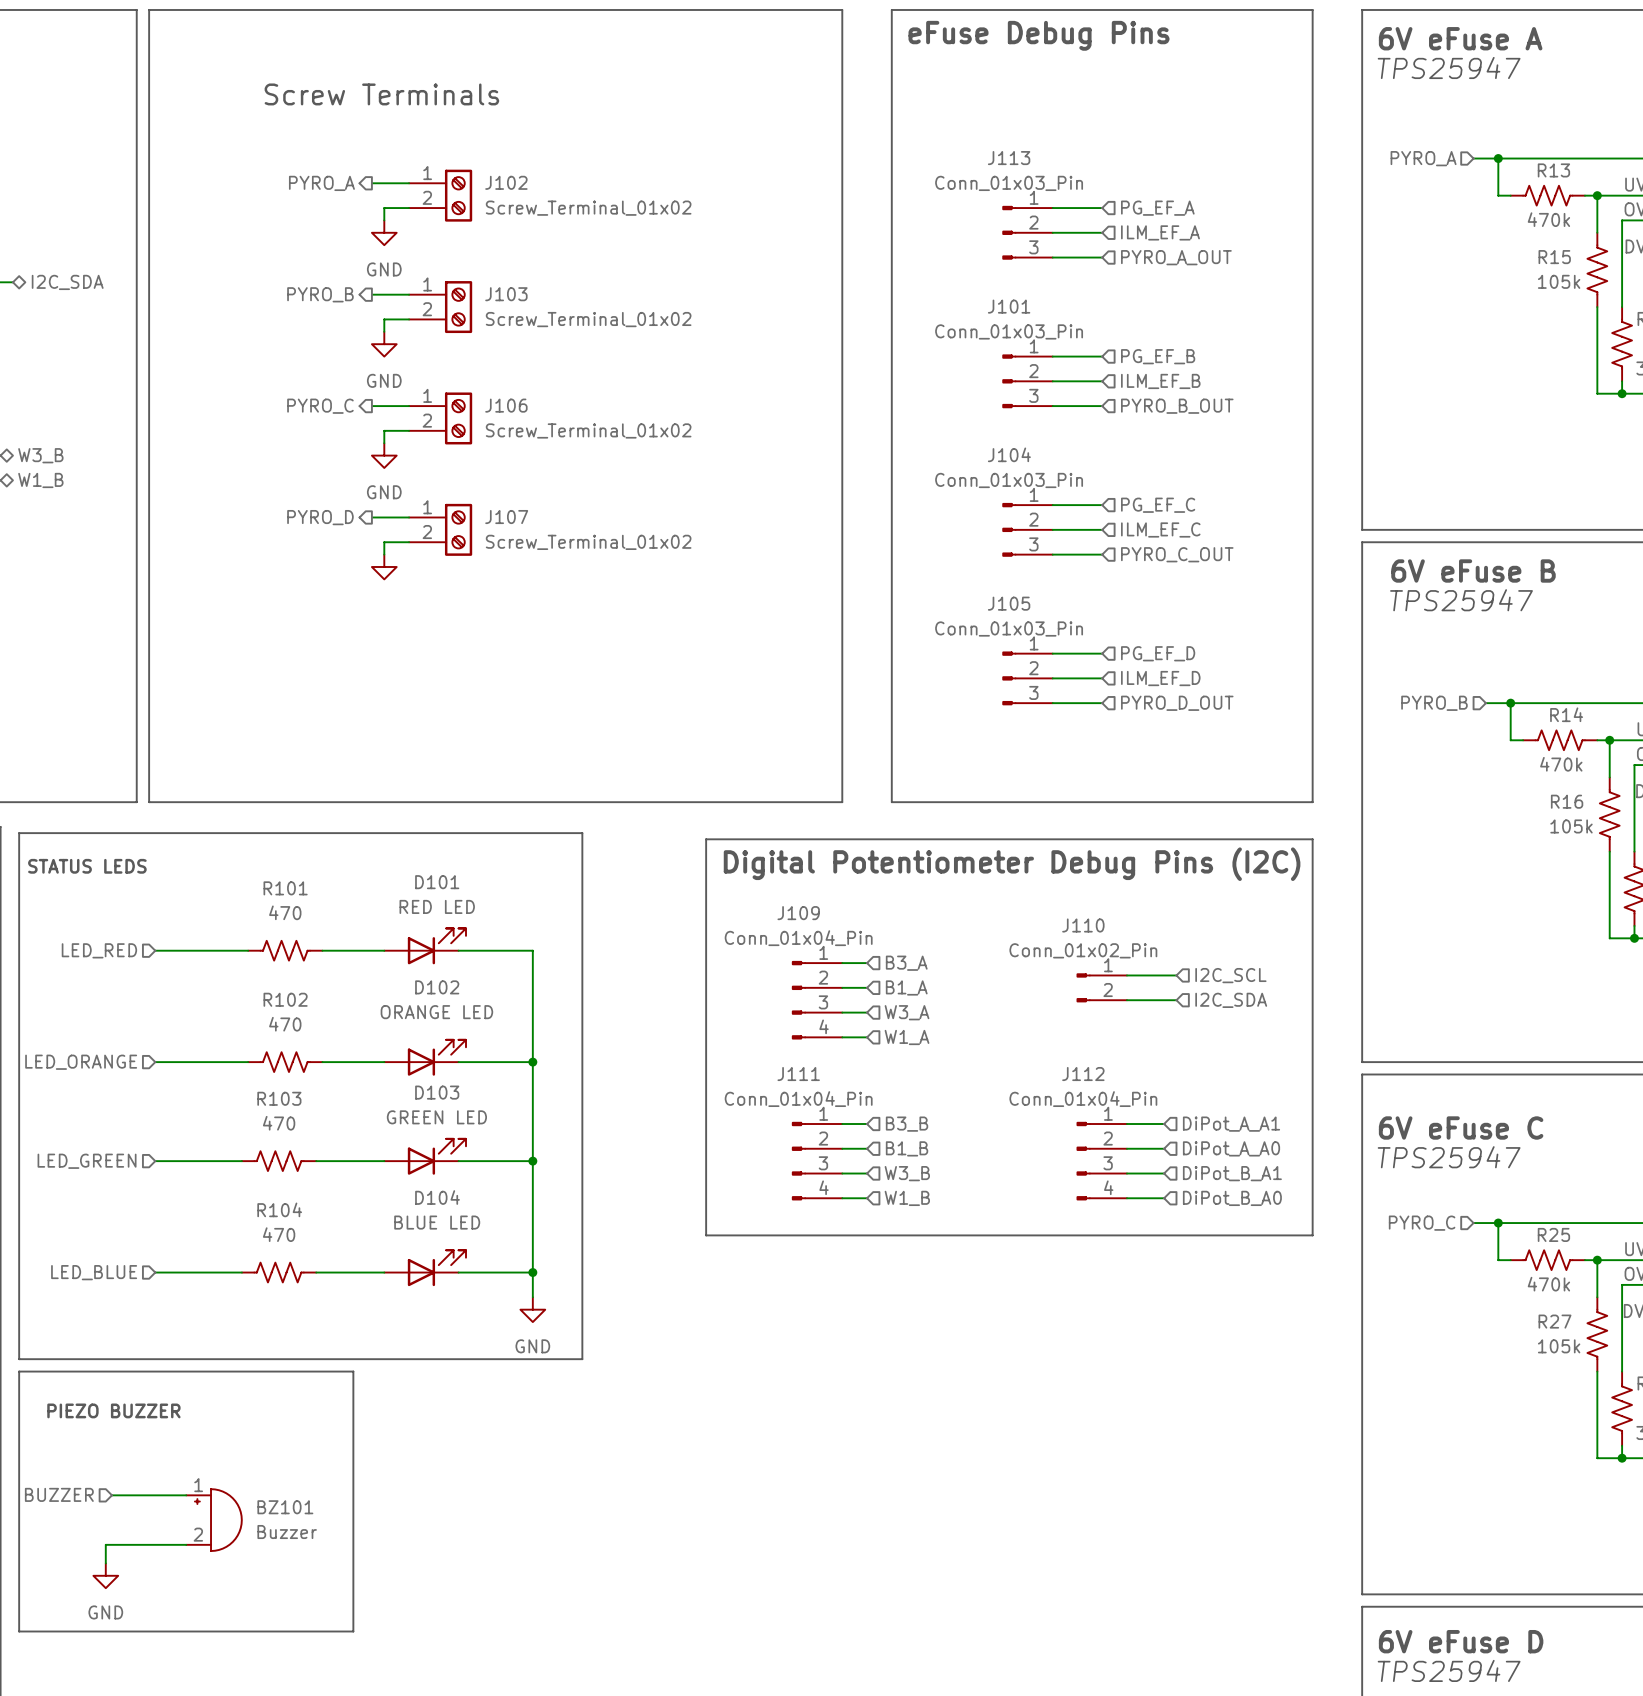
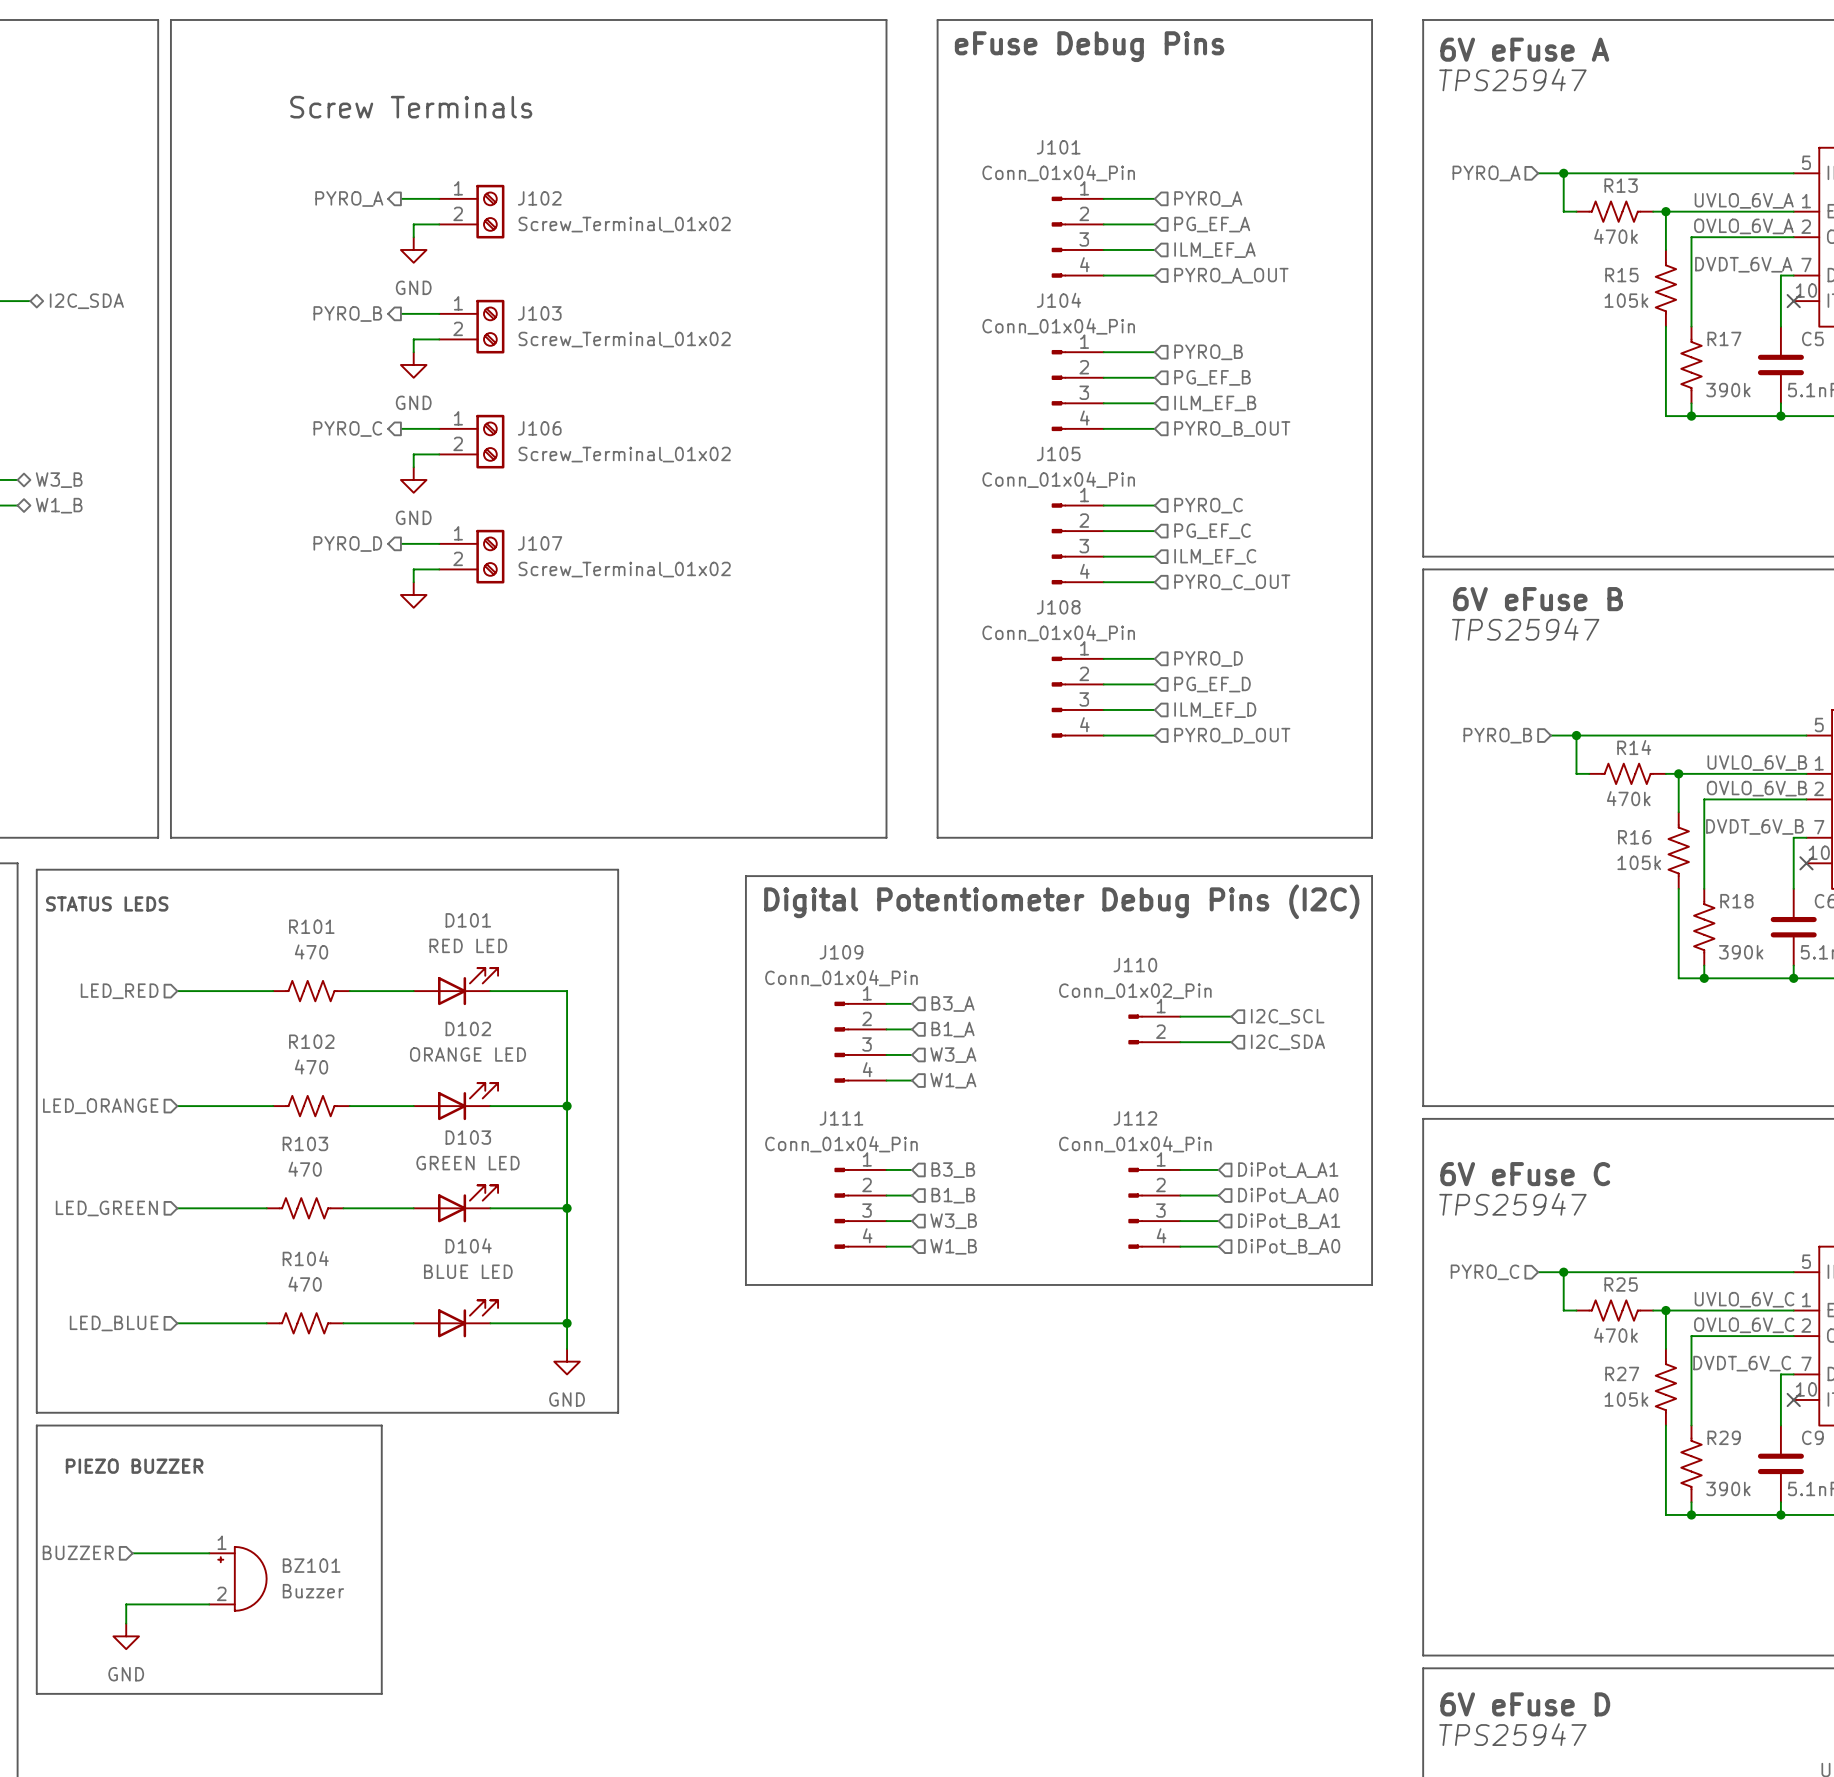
wire: none -> (1103, 198) (1154, 198)
hierarchical label: none -> PYRO_A (1208, 199)
J113: Conn_01x03_Pin (1027, 232) -> none
J101 value: Conn_01x03_Pin (1009, 331) -> Conn_01x04_Pin (1058, 173)
wire: none -> (1103, 352) (1154, 352)
hierarchical label: none -> PYRO_B (1208, 352)
J101 symbol: [1002, 354, 1053, 409] -> [1051, 196, 1104, 278]
J104 value: Conn_01x03_Pin (1009, 480) -> Conn_01x04_Pin (1058, 326)
wire: none -> (1103, 505) (1154, 505)
hierarchical label: none -> PYRO_C (1208, 505)
J104 symbol: [1002, 503, 1053, 557] -> [1051, 350, 1104, 431]
wire: none -> (1103, 658) (1154, 658)
J105 value: Conn_01x03_Pin (1009, 629) -> Conn_01x04_Pin (1058, 479)
hierarchical label: none -> PYRO_D (1208, 659)
J105 symbol: [1002, 651, 1053, 706] -> [1051, 503, 1104, 585]
J108: none -> Conn_01x04_Pin (1077, 697)

